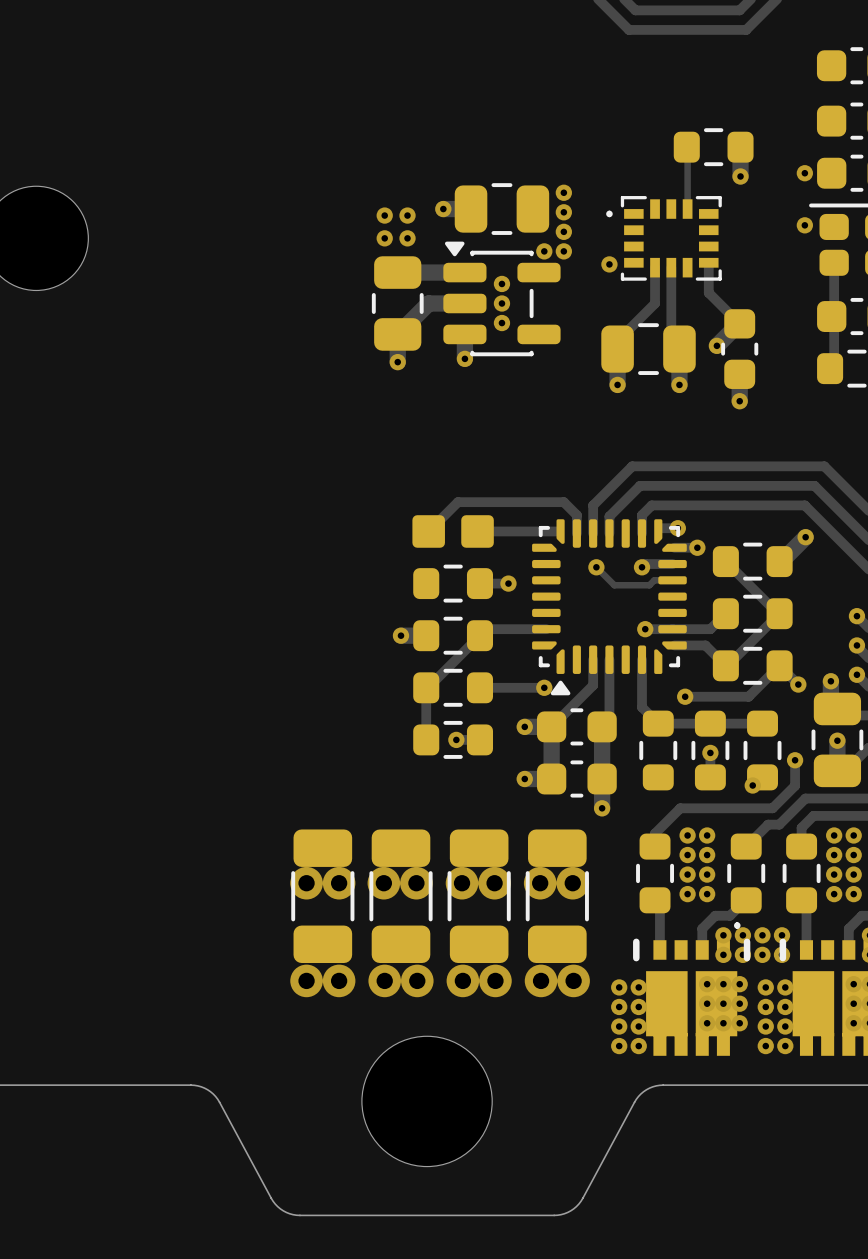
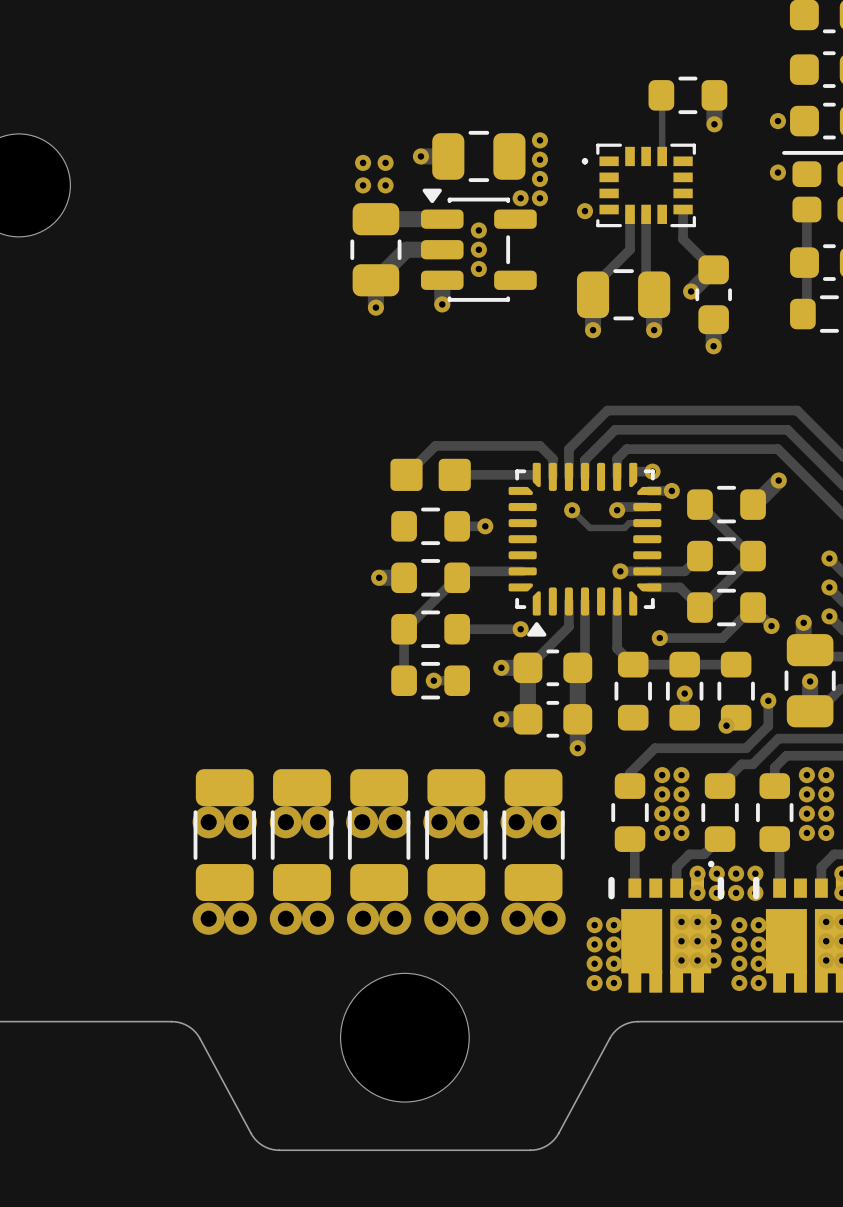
via: none -> (208, 822)
via: none -> (240, 822)
part: none -> (224, 835)
via: none -> (208, 918)
via: none -> (240, 918)

